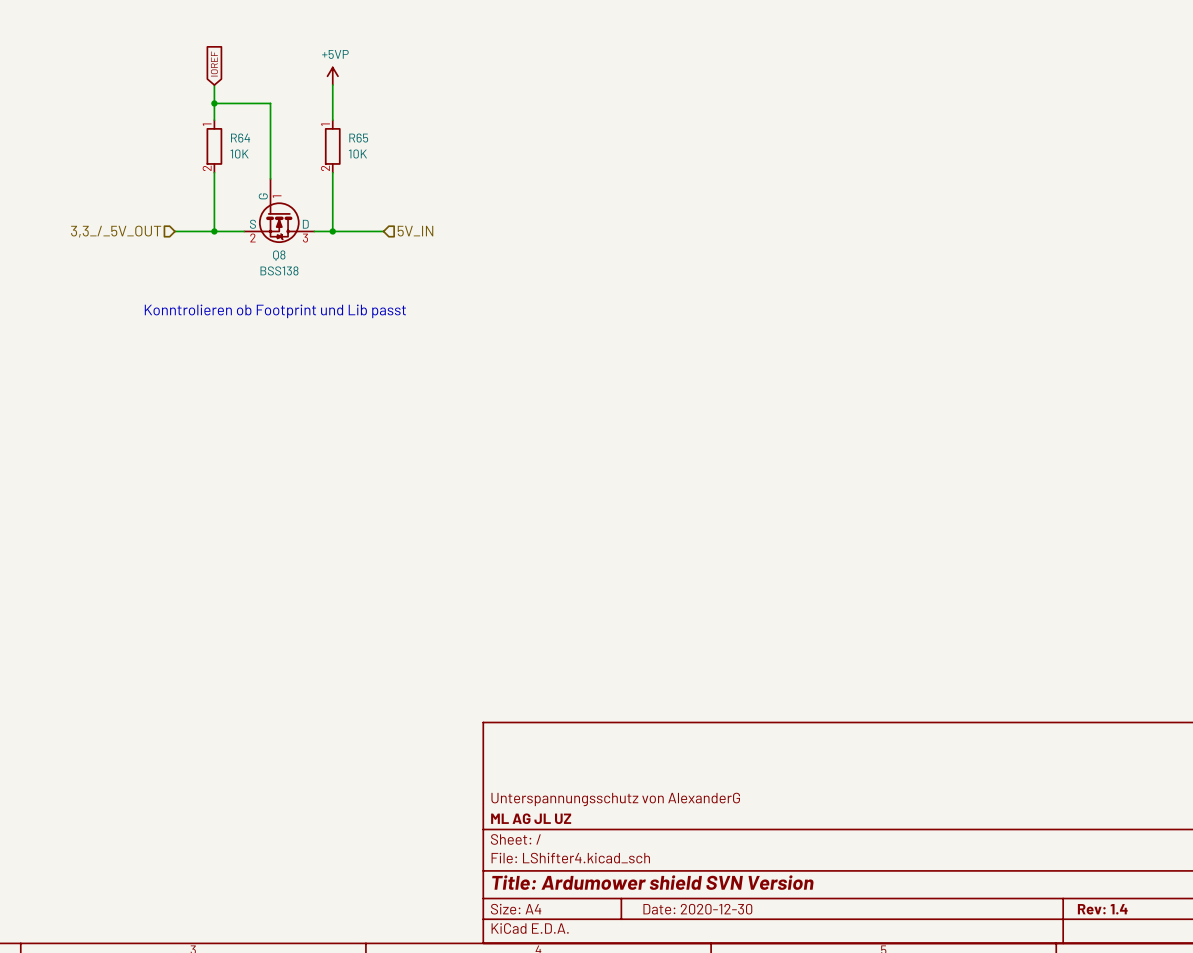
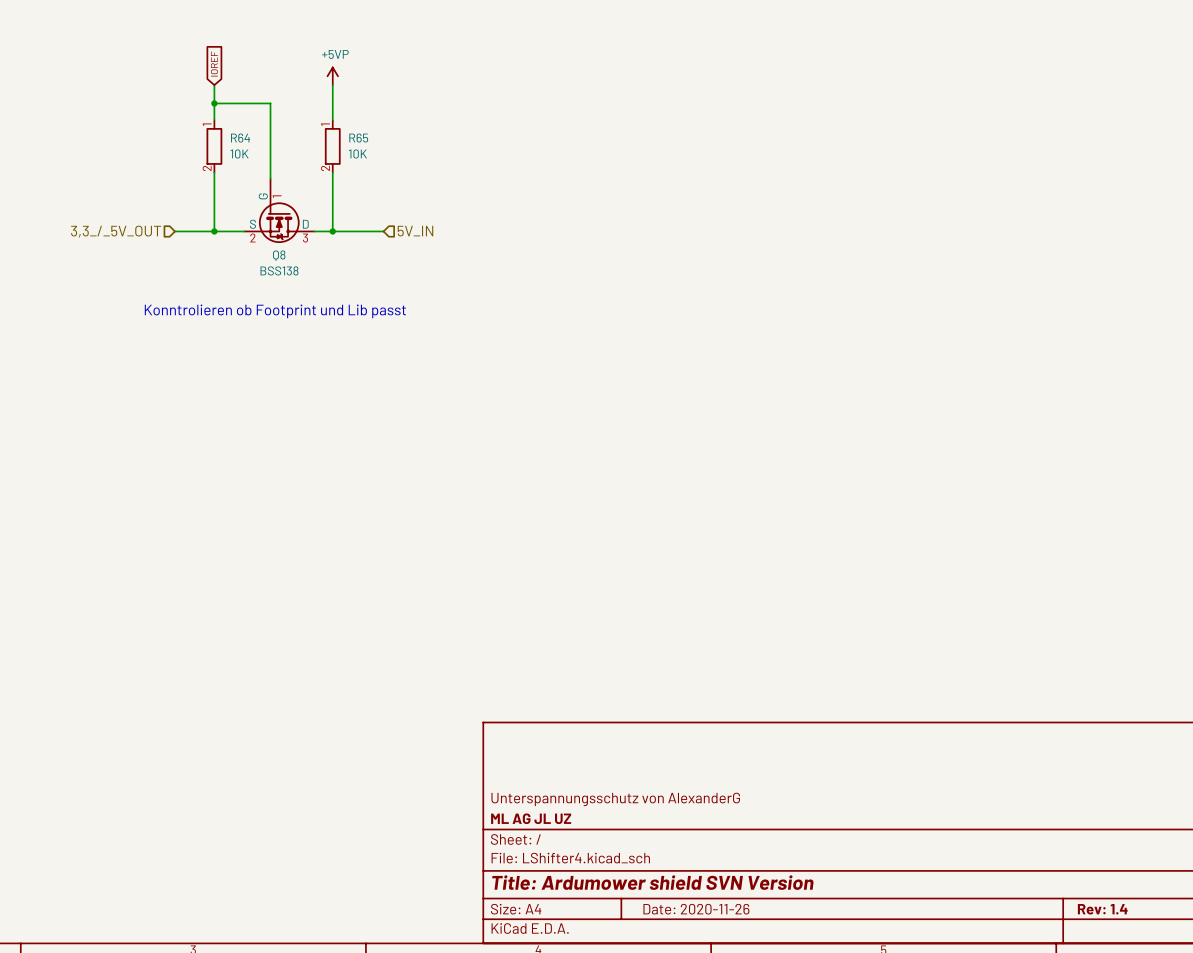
title block: Date: 2020-12-30 (697, 909) -> Date: 2020-11-26 (696, 909)

